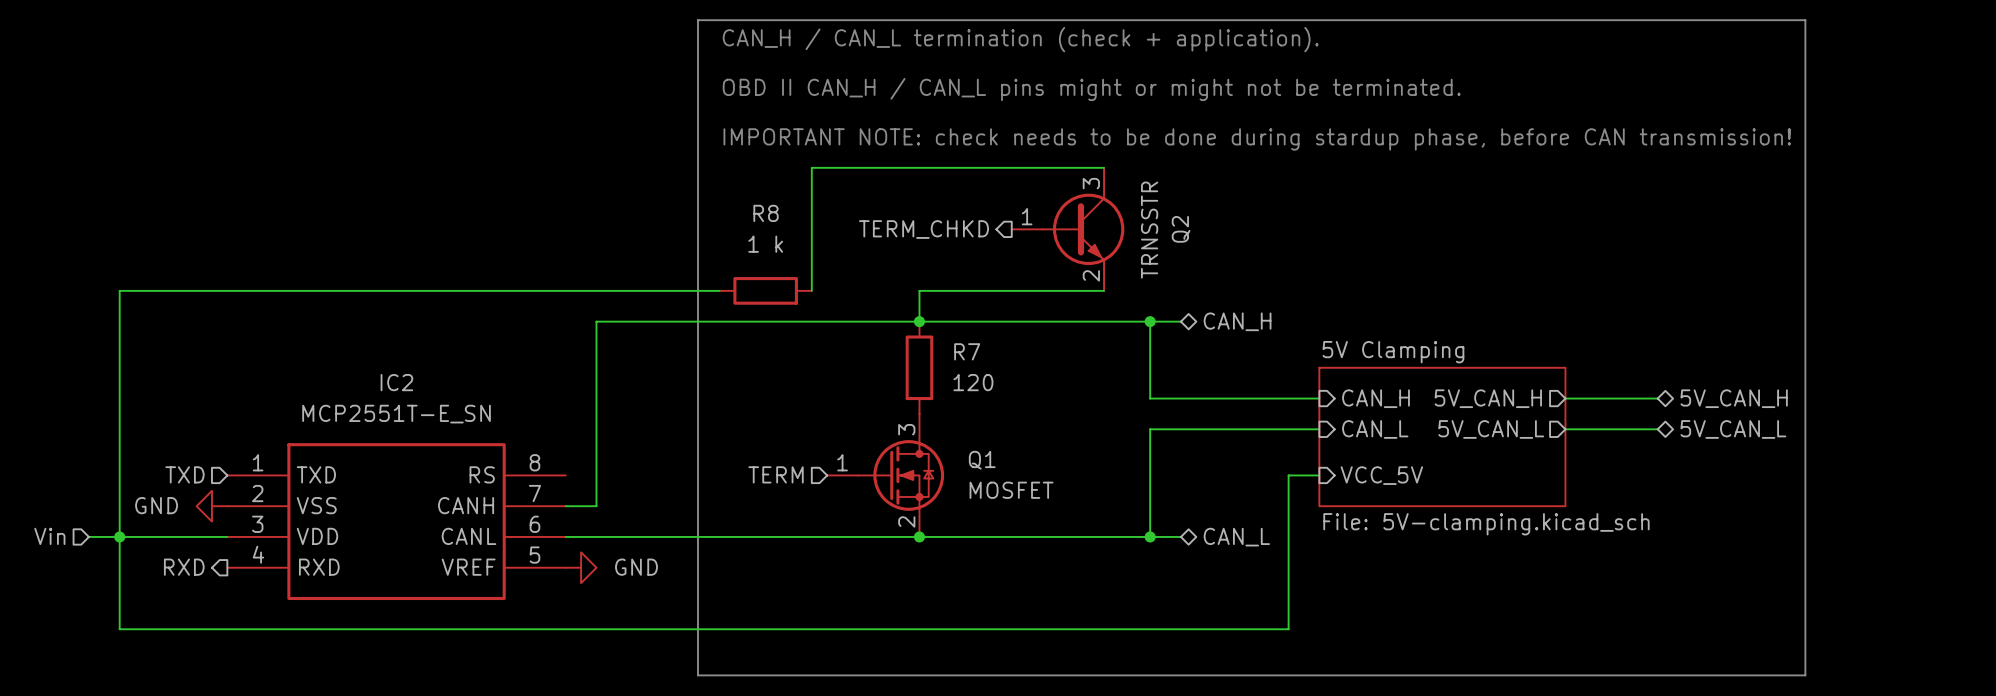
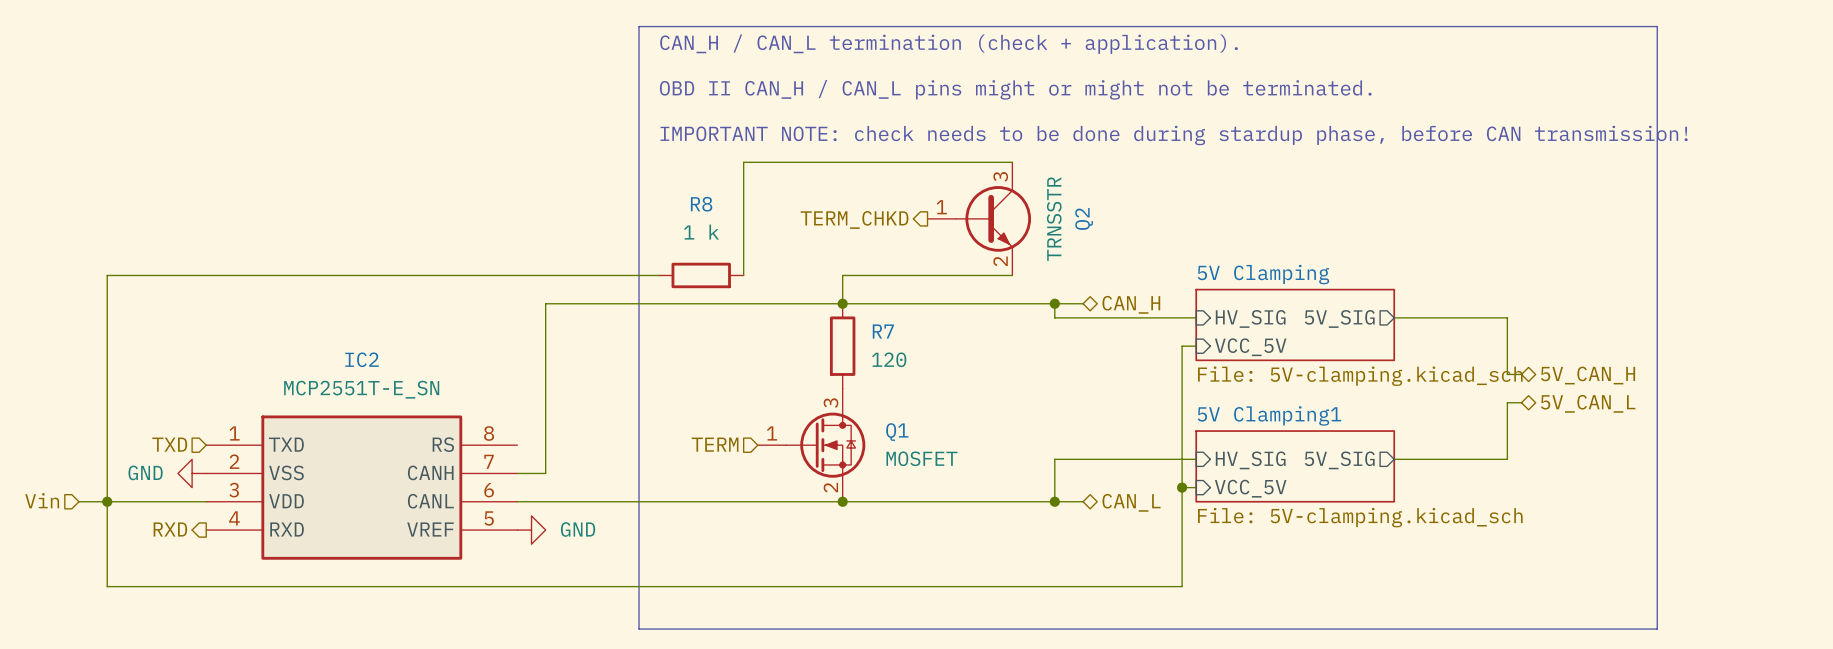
wire: (1150, 337) (1150, 398) (1319, 398) -> (1054, 317) (1196, 317)
sheet pin: none -> HV_SIG (1250, 318)
sheet pin: none -> 5V_SIG (1339, 318)
sheet 5V Clamping name position: 5V Clamping (1393, 352) -> 5V Clamping (1263, 274)
sheet 5V Clamping shape: [1318, 366, 1567, 508] -> [1195, 288, 1396, 362]
sheet pin: none -> VCC_5V (1250, 347)
sheet pin: CAN_H (1375, 398) -> none
sheet pin: 5V_CAN_H (1488, 398) -> none
wire: (1565, 398) (1642, 398) -> (1394, 317) (1507, 317) (1507, 374)
wire: (1319, 429) (1150, 429) (1150, 490) -> (1196, 459) (1054, 459)
sheet pin: CAN_L (1375, 429) -> none
sheet pin: 5V_CAN_L (1491, 429) -> none
wire: (1565, 429) (1642, 429) -> (1394, 459) (1507, 459) (1507, 402)
wire: (1288, 475) (1319, 475) -> (1182, 445) (1182, 346) (1196, 346)
sheet pin position: VCC_5V (1381, 475) -> VCC_5V (1250, 488)
sheet pin: none -> HV_SIG (1250, 460)
sheet pin: none -> 5V_SIG (1339, 460)
sheet 5V Clamping1: none -> File: 5V-clamping.kicad_sch (1295, 466)
wire: none -> (1182, 487) (1196, 487)
junction: none -> (1182, 487)
sheet 5V Clamping value position: File: 5V-clamping.kicad_sch (1486, 524) -> File: 5V-clamping.kicad_sch (1360, 376)

